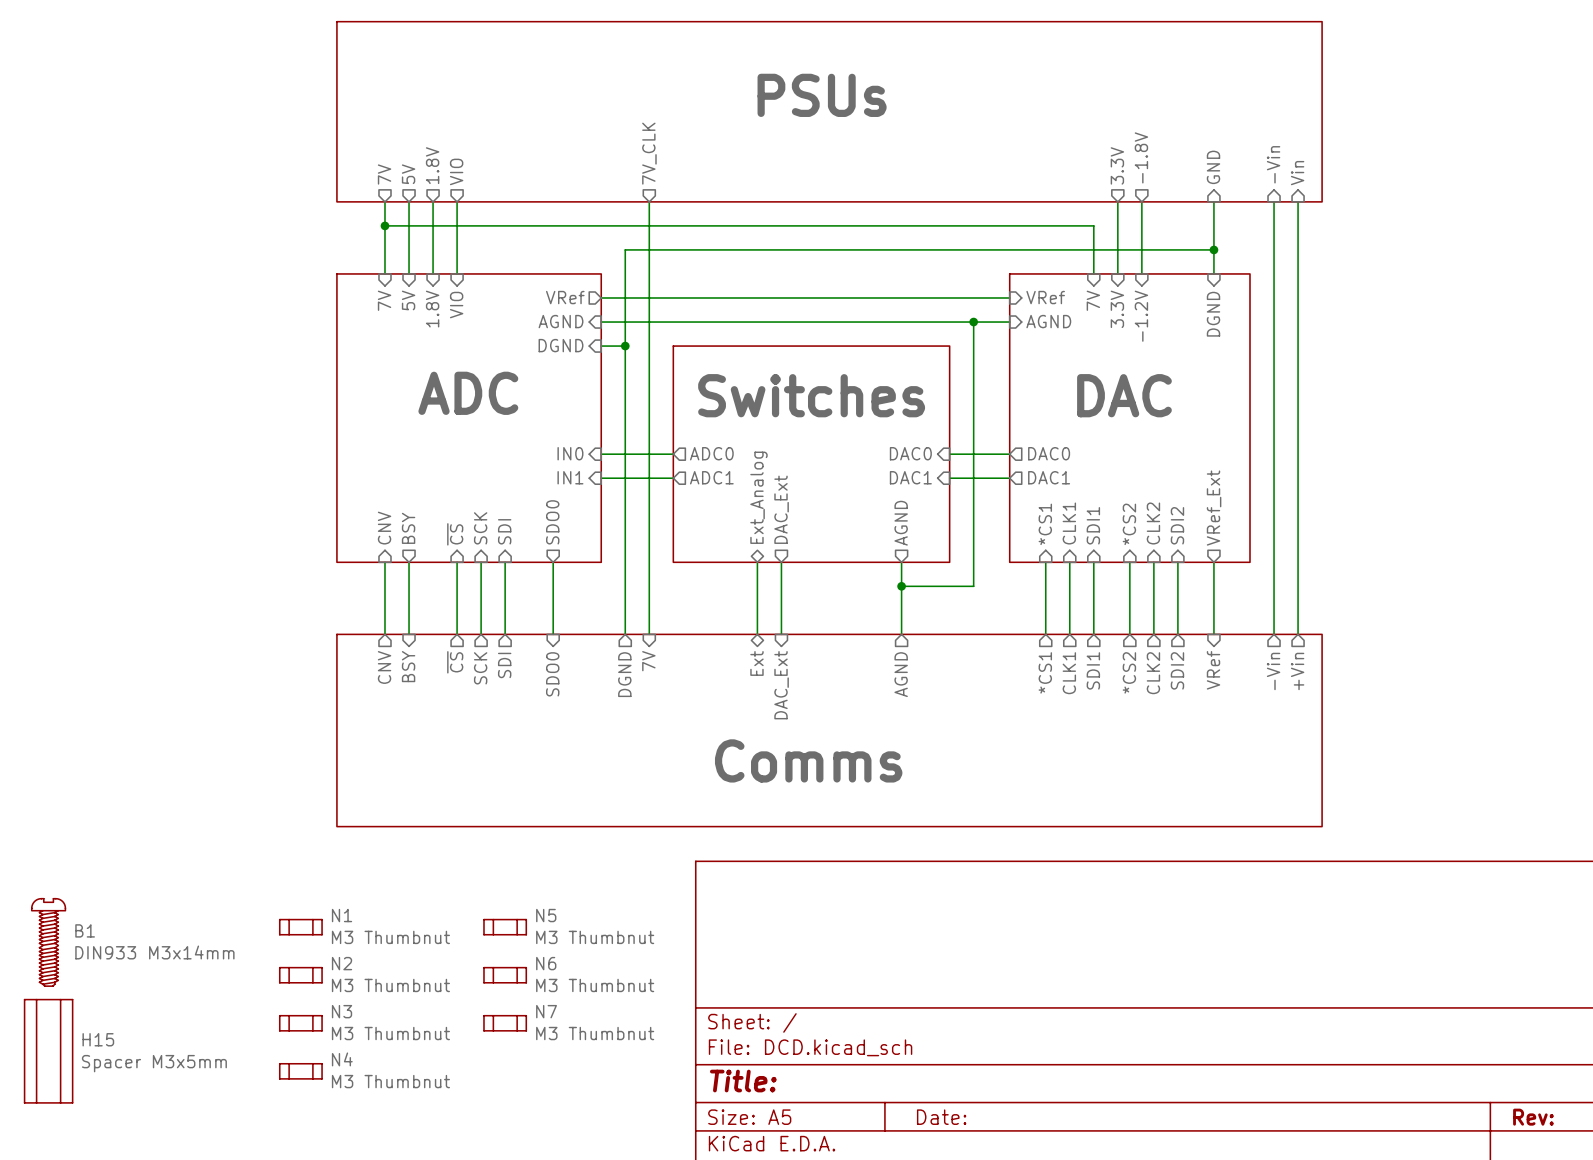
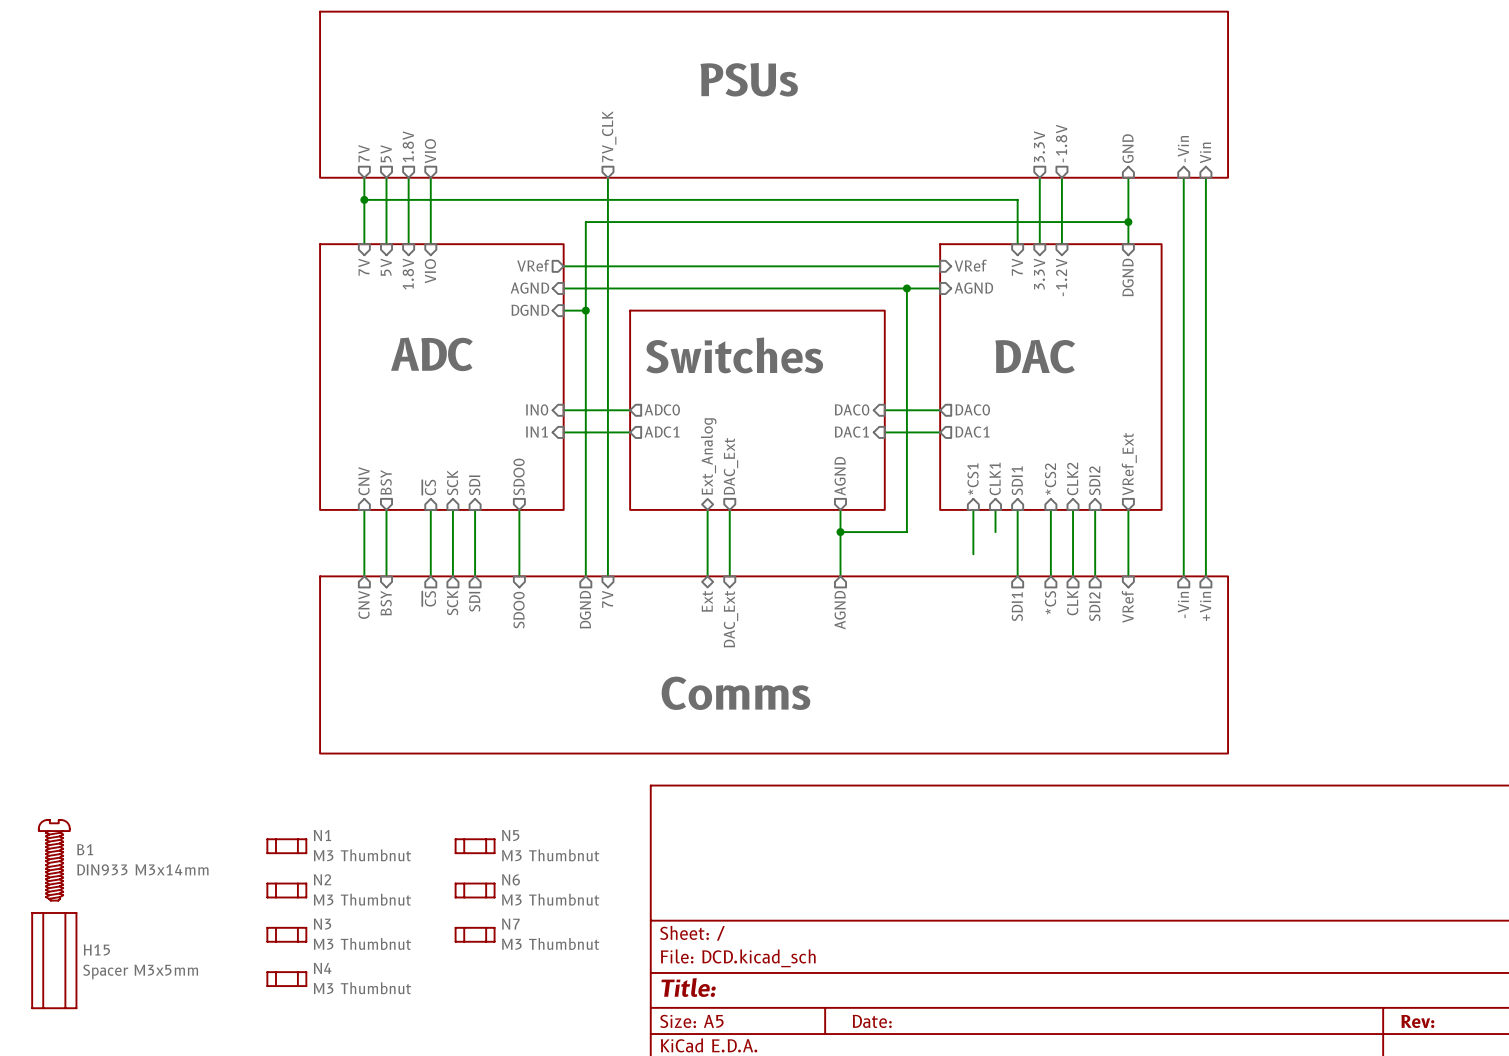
wire: (1069, 586) (1069, 634) -> none
wire: (1045, 610) (1045, 634) -> none
sheet pin: *CS1 (1045, 672) -> none
sheet pin: *CS2 (1129, 672) -> *CS (1050, 602)
sheet pin: CLK1 (1069, 673) -> none
sheet pin: CLK2 (1153, 673) -> CLK (1072, 602)

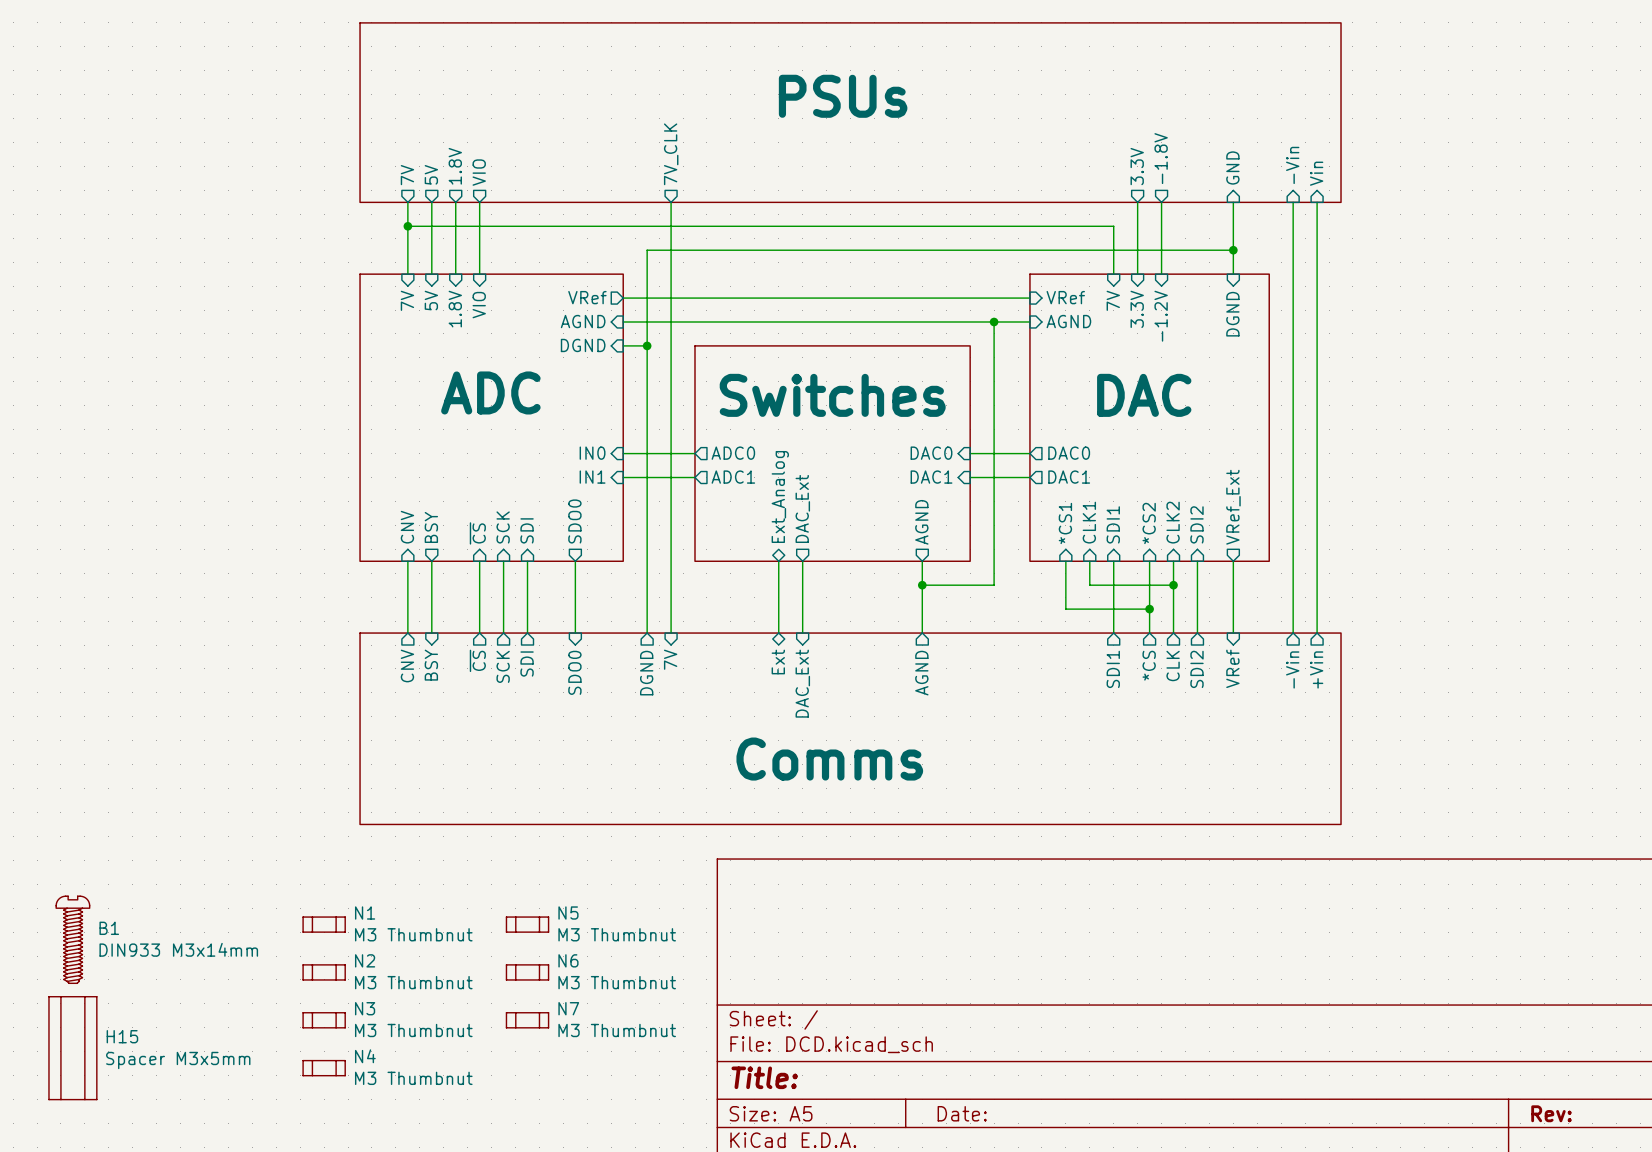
wire: none -> (1089, 585) (1173, 585)
junction: none -> (1173, 585)
wire: none -> (1065, 609) (1149, 609)
junction: none -> (1149, 609)

